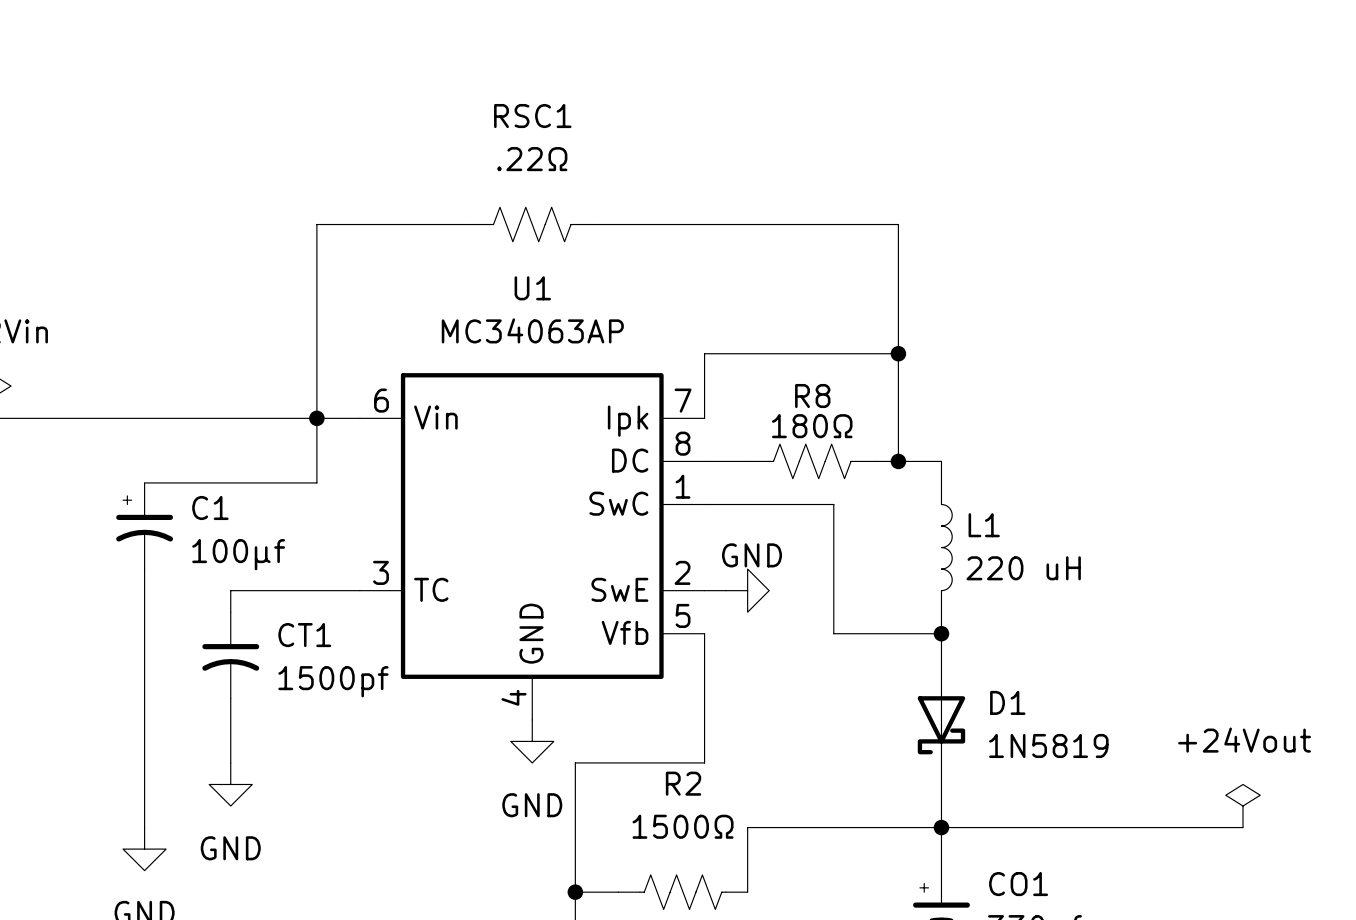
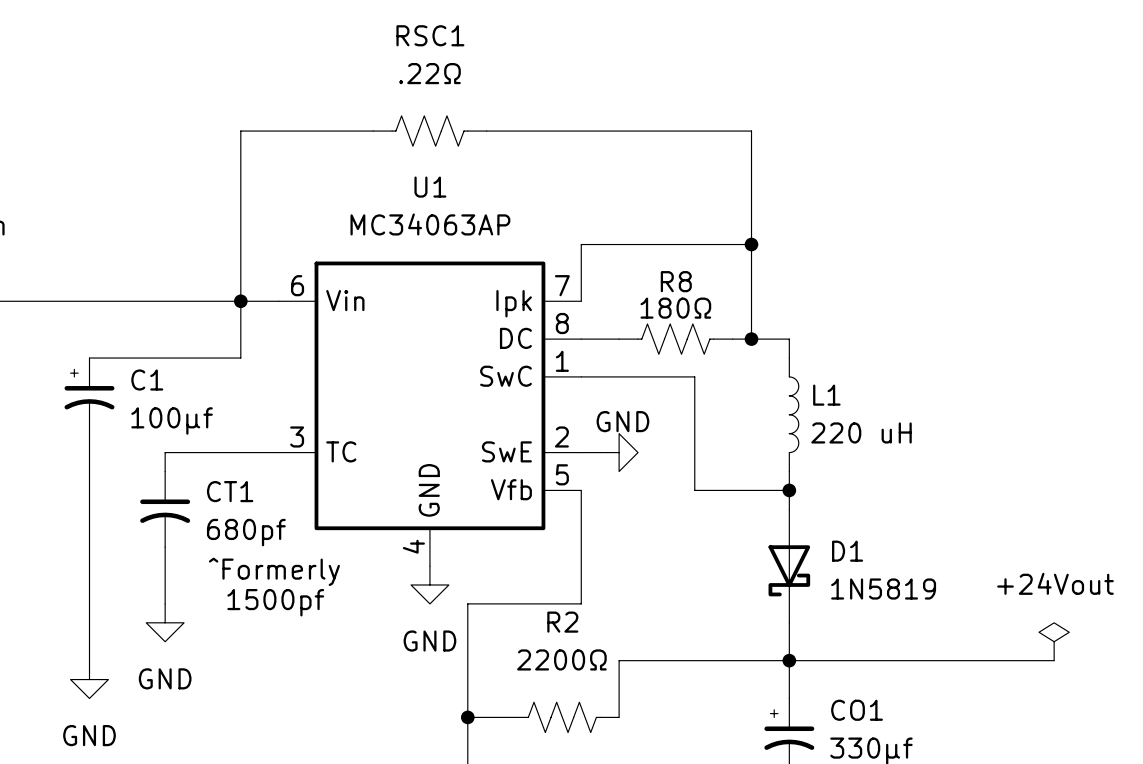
CT1 value: 1500pf (333, 681) -> 680pf (246, 532)
text: none -> ^Formerly (274, 571)
text: none -> 1500pf (275, 602)
R2 value: 1500Ω (683, 826) -> 2200Ω (561, 659)

